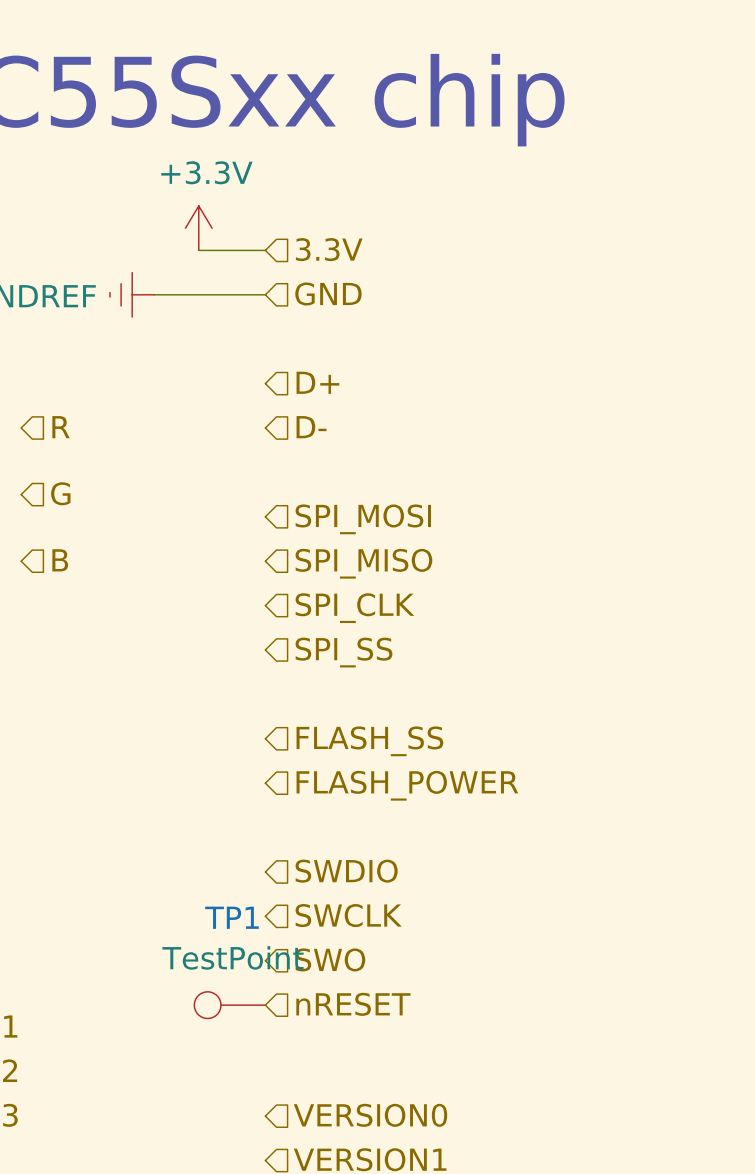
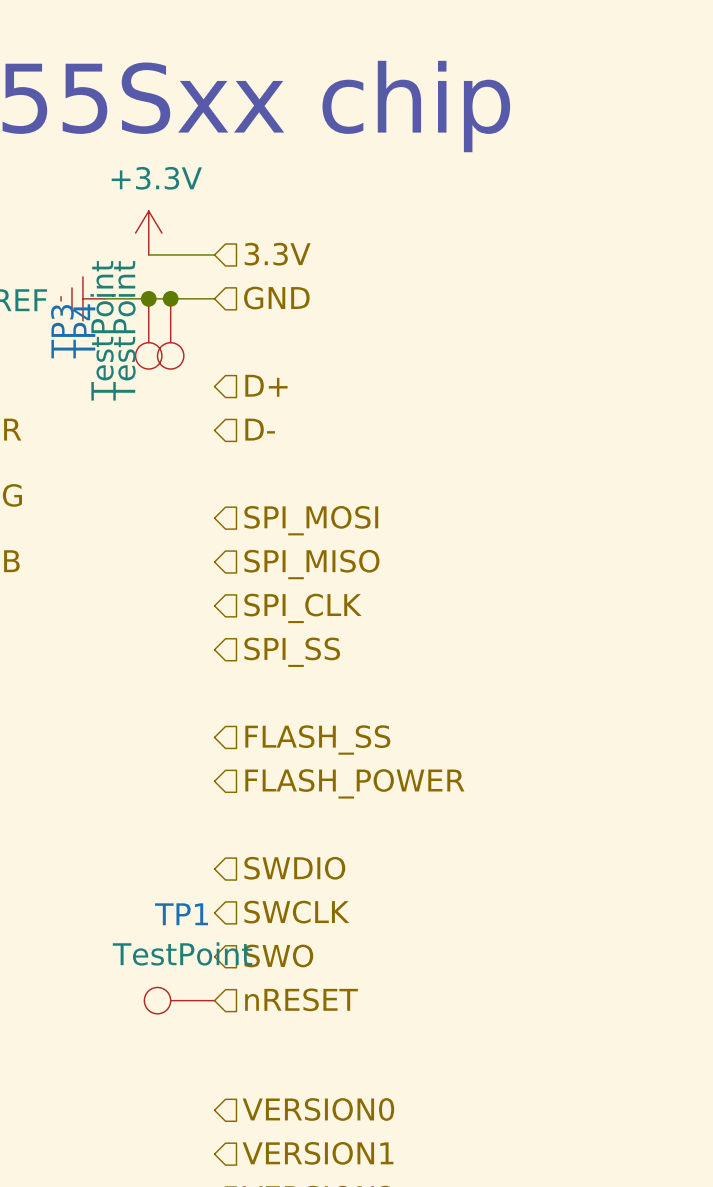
junction: none -> (148, 298)
junction: none -> (170, 298)
TP3: none -> TestPoint (148, 333)
TP4: none -> TestPoint (170, 333)

